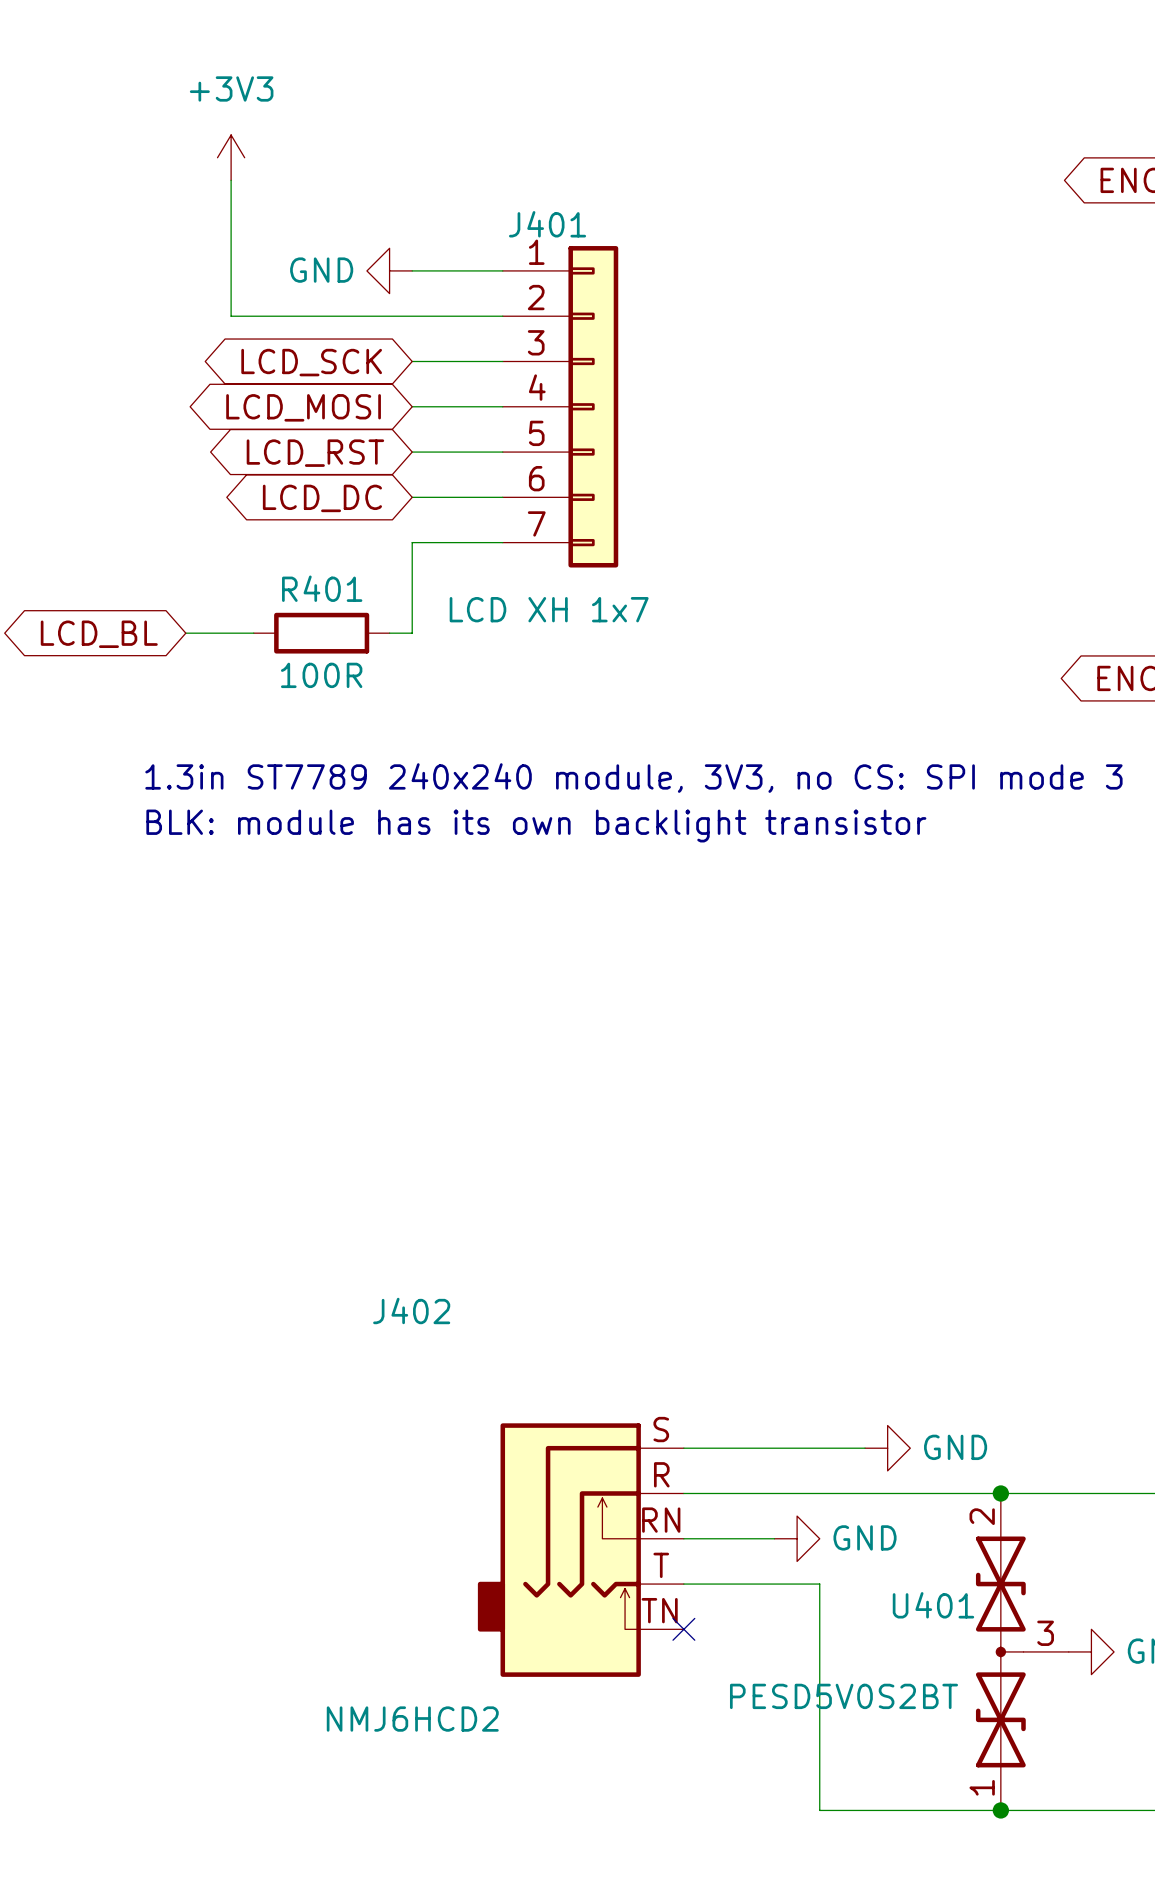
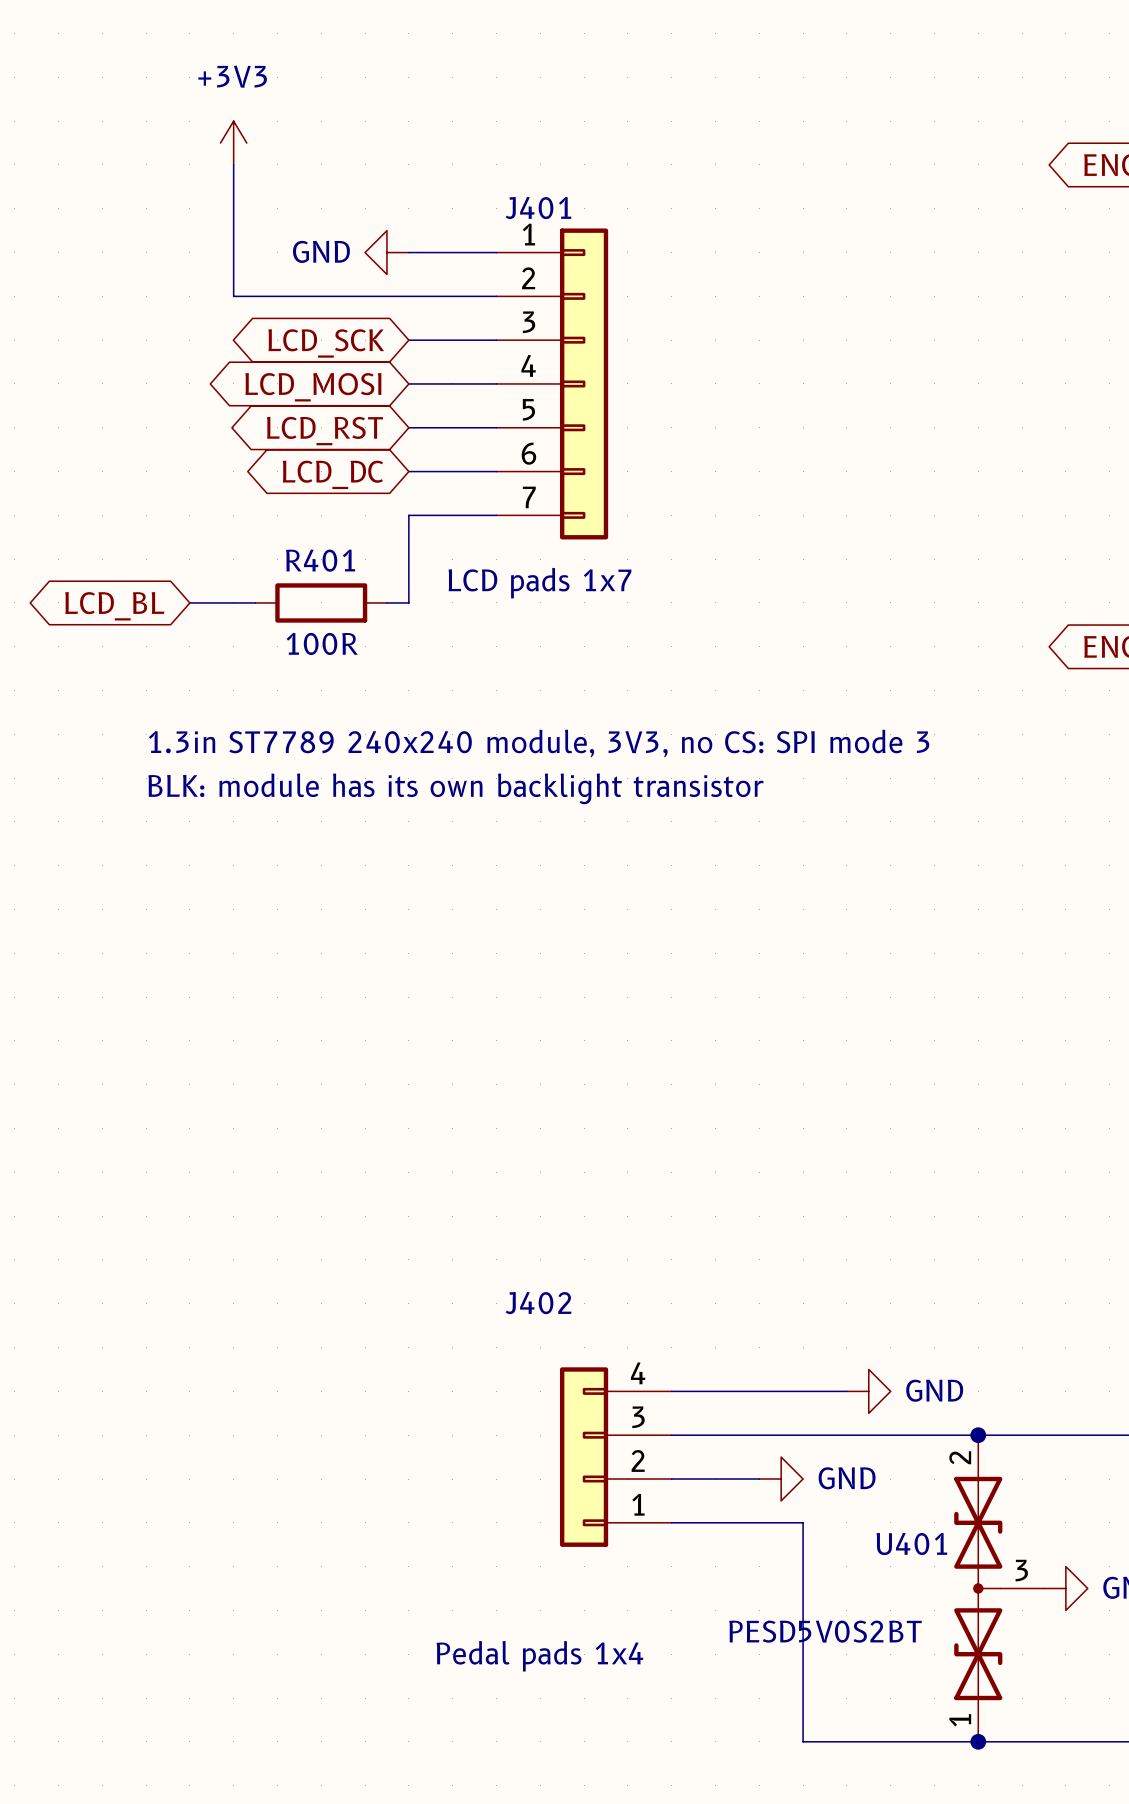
J401 value: LCD XH 1x7 (549, 609) -> LCD pads 1x7 (539, 583)
J402 name position: J402 (411, 1310) -> J402 (538, 1303)
J402 symbol: [477, 1423, 684, 1677] -> [559, 1367, 672, 1547]
no-connect mark: (683, 1629) -> none
J402 value: NMJ6HCD2 (412, 1719) -> Pedal pads 1x4 (539, 1656)

